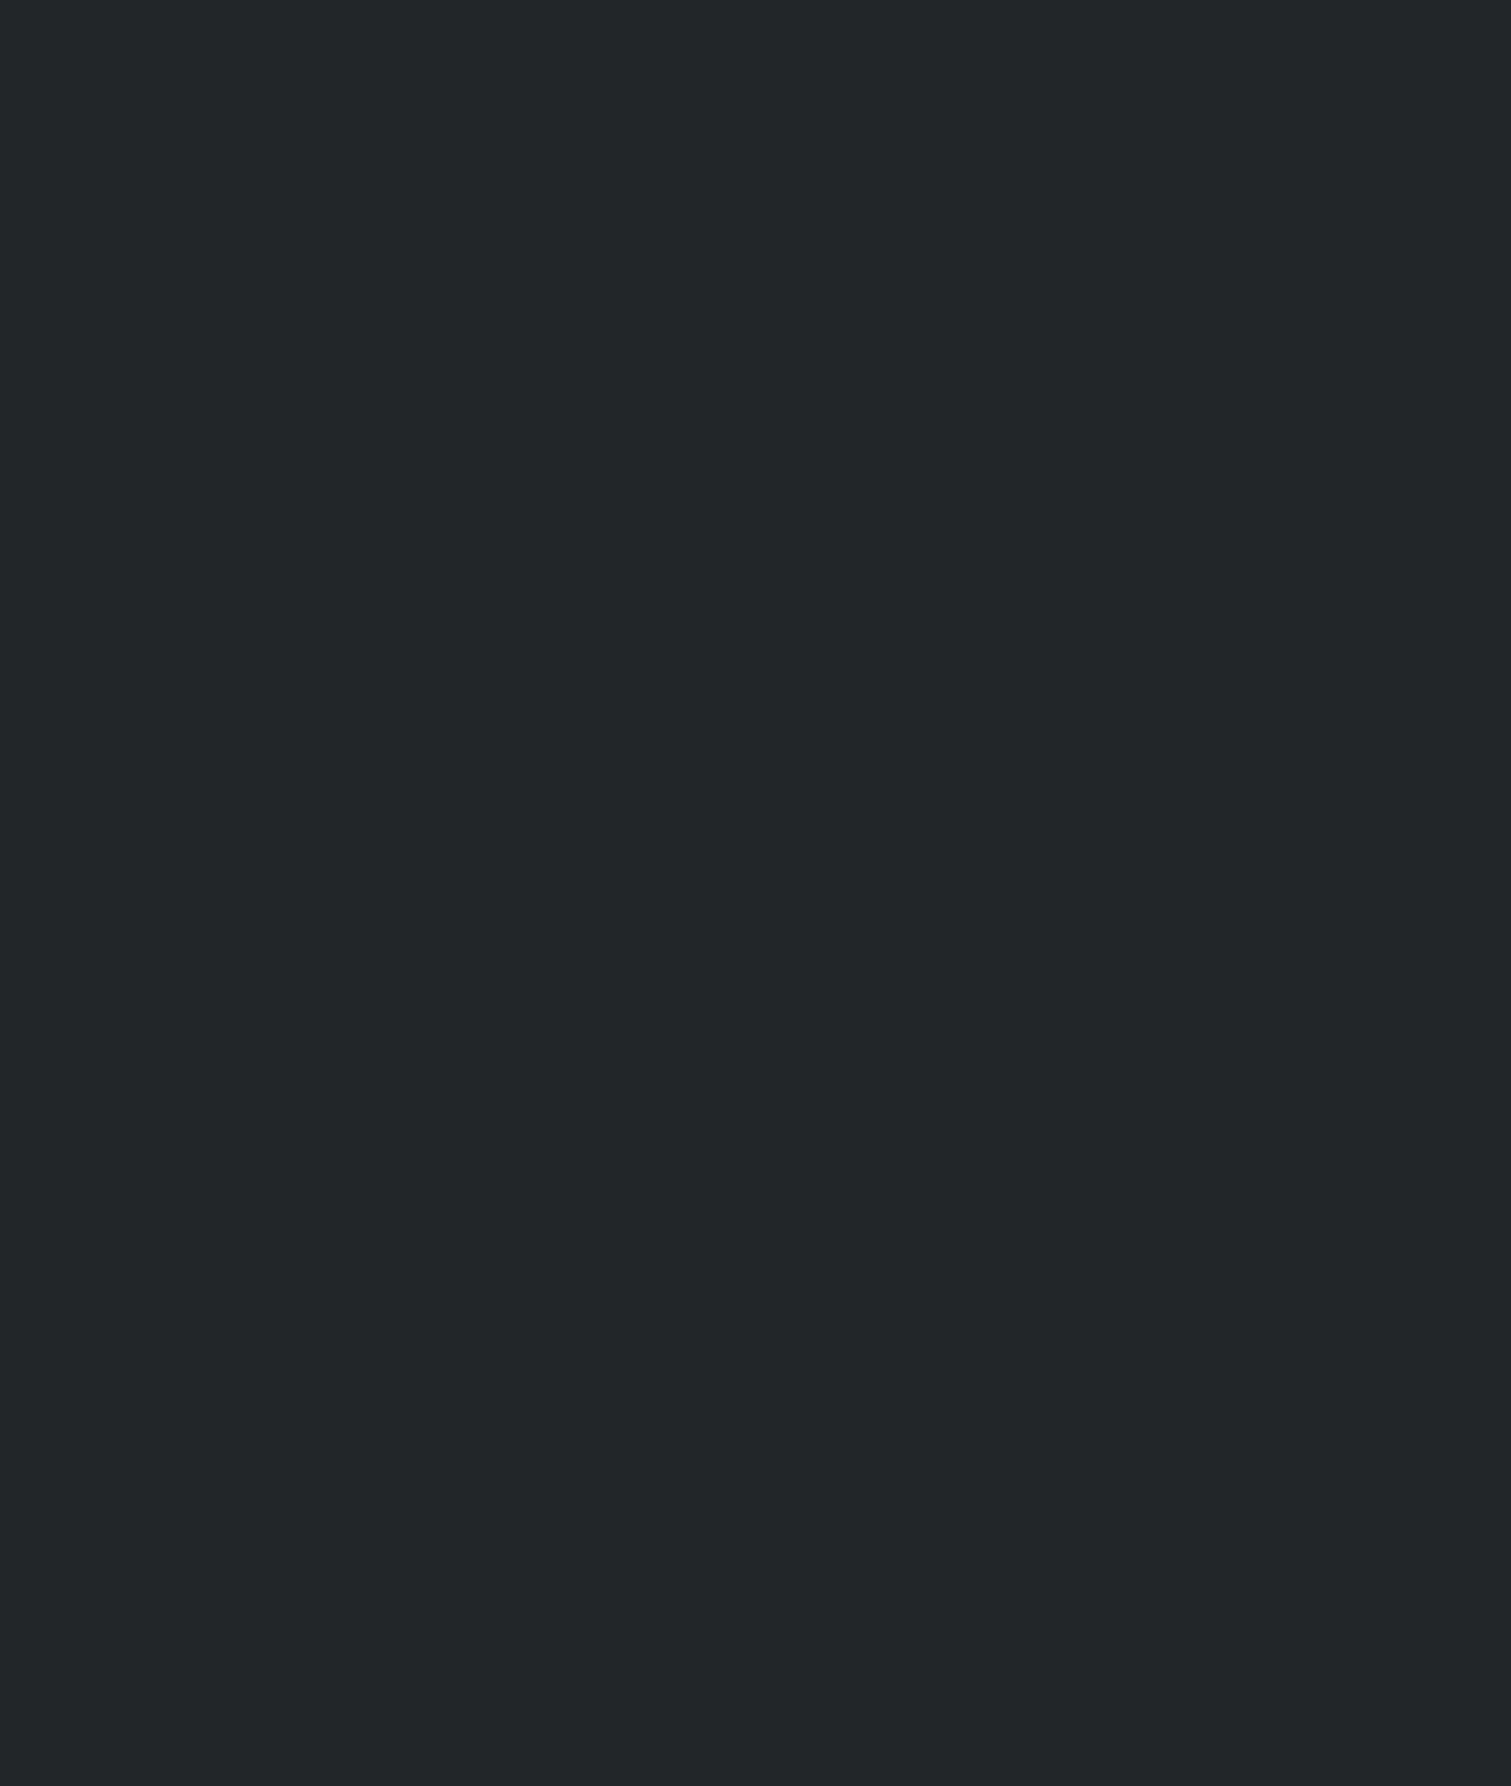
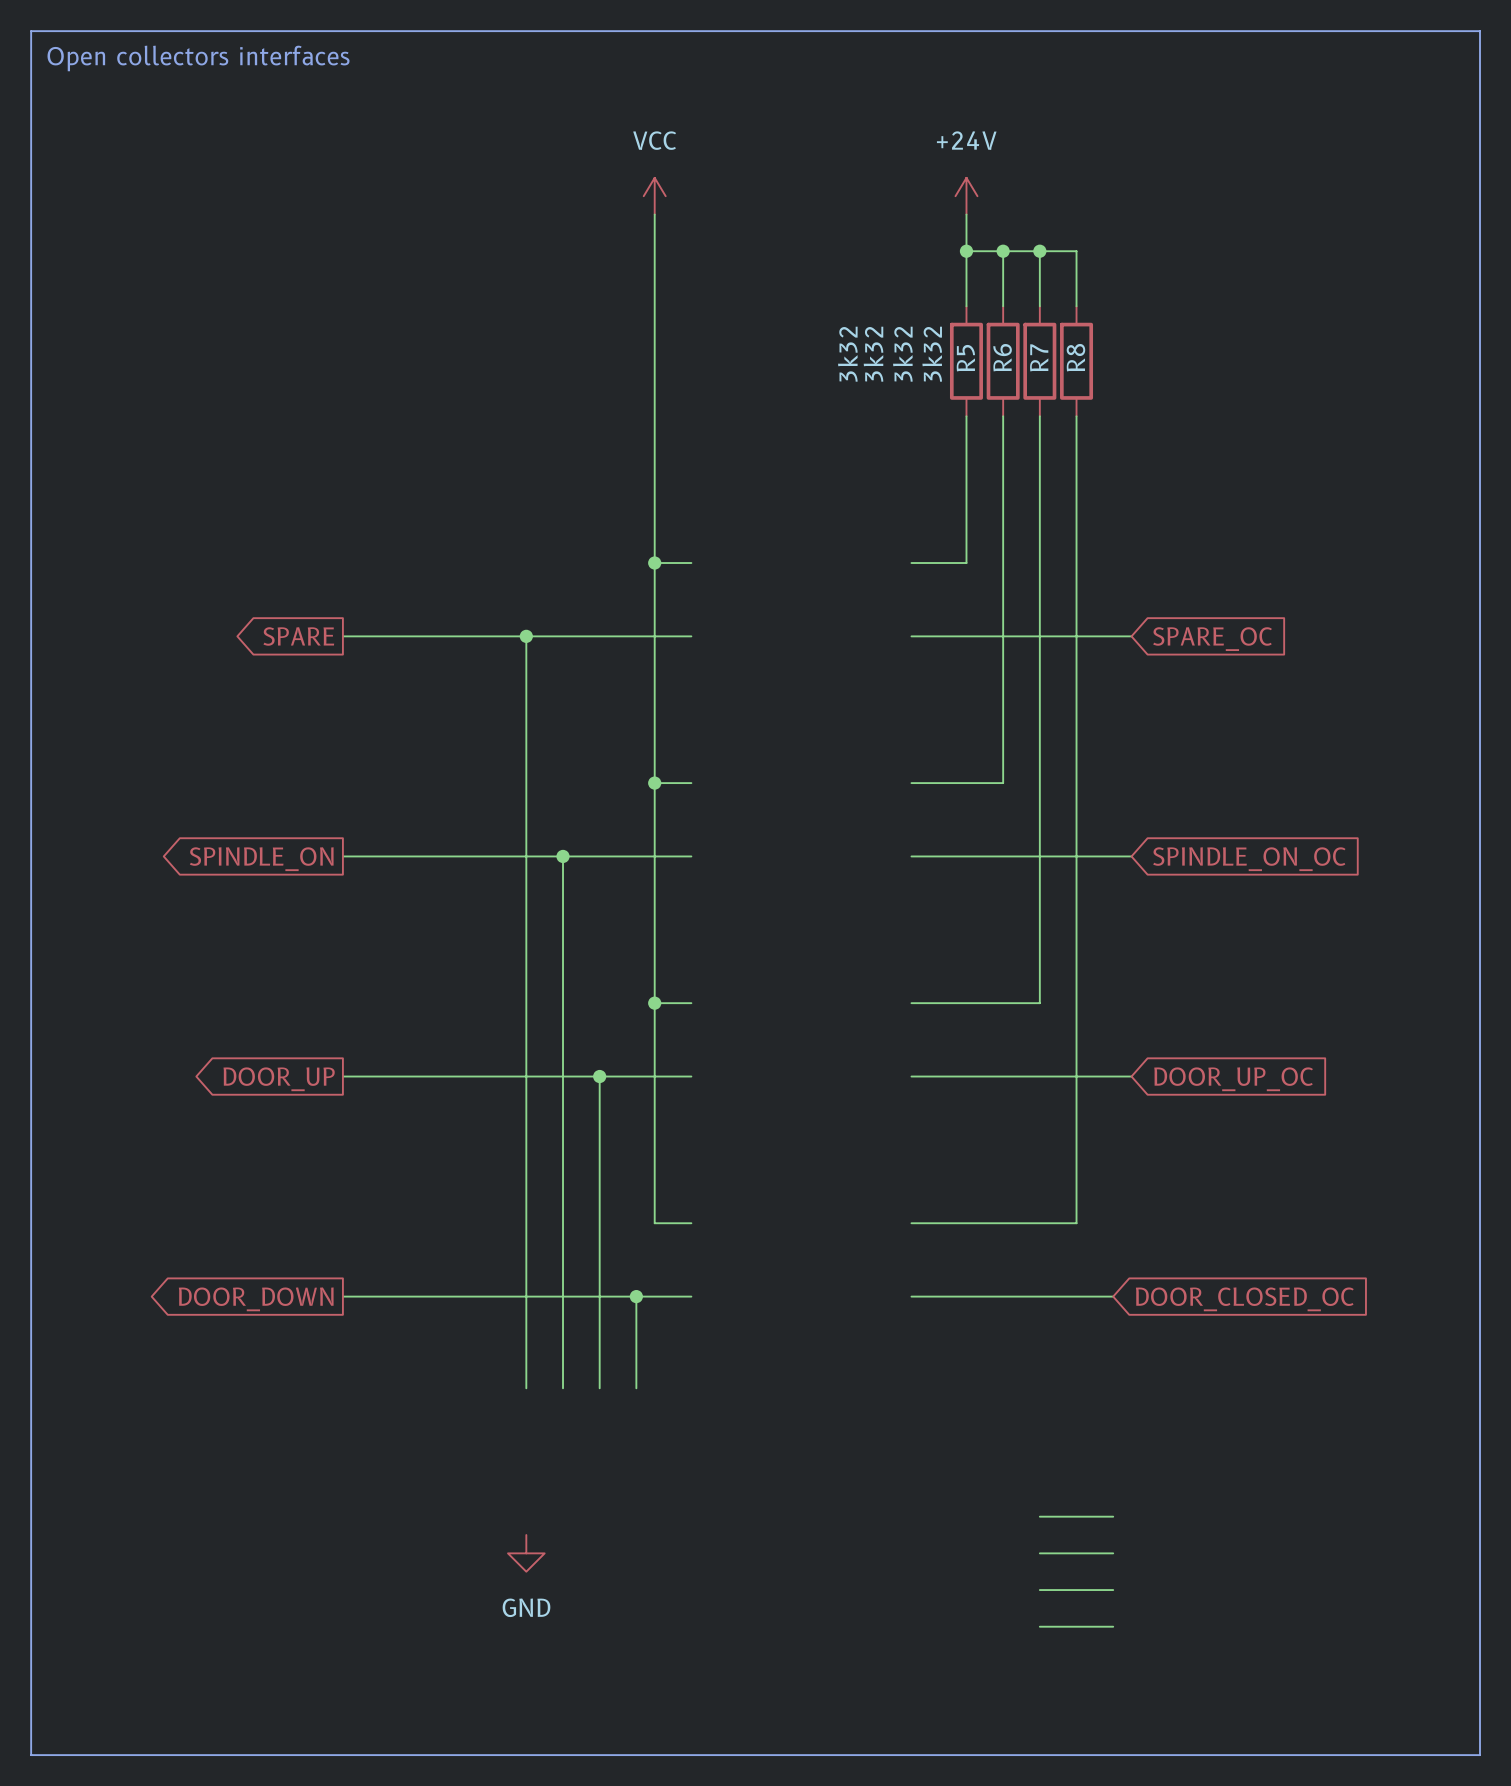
line: none -> (31, 31) (1480, 31) (1480, 1755) (31, 1755) (31, 31)
text: none -> Open collectors interfaces (198, 58)
power symbol: none -> VCC (654, 196)
power symbol: none -> +24V (966, 196)
wire: none -> (654, 214) (654, 1223) (691, 1223)
wire: none -> (966, 214) (966, 306)
wire: none -> (966, 251) (1076, 251) (1076, 306)
junction: none -> (966, 251)
wire: none -> (1003, 251) (1003, 306)
junction: none -> (1003, 251)
wire: none -> (1039, 251) (1039, 306)
junction: none -> (1039, 251)
R5: none -> 3k32 (966, 361)
R6: none -> 3k32 (1003, 361)
R7: none -> 3k32 (1039, 361)
R8: none -> 3k32 (1076, 361)
wire: none -> (966, 416) (966, 563) (911, 563)
wire: none -> (1003, 416) (1003, 783) (911, 783)
wire: none -> (1039, 416) (1039, 1003) (911, 1003)
wire: none -> (1076, 416) (1076, 1223) (911, 1223)
wire: none -> (654, 563) (691, 563)
junction: none -> (654, 563)
global label: none -> SPARE (298, 636)
wire: none -> (342, 636) (691, 636)
wire: none -> (526, 636) (526, 1388)
junction: none -> (526, 636)
wire: none -> (911, 636) (1131, 636)
global label: none -> SPARE_OC (1212, 639)
wire: none -> (654, 783) (691, 783)
junction: none -> (654, 783)
wire: none -> (342, 856) (691, 856)
wire: none -> (563, 856) (563, 1388)
junction: none -> (563, 856)
wire: none -> (911, 856) (1131, 856)
global label: none -> SPINDLE_ON (261, 859)
global label: none -> SPINDLE_ON_OC (1249, 859)
wire: none -> (654, 1003) (691, 1003)
junction: none -> (654, 1003)
wire: none -> (342, 1076) (691, 1076)
wire: none -> (599, 1076) (599, 1388)
junction: none -> (599, 1076)
wire: none -> (911, 1076) (1131, 1076)
global label: none -> DOOR_UP (279, 1079)
global label: none -> DOOR_UP_OC (1233, 1079)
wire: none -> (342, 1296) (691, 1296)
wire: none -> (636, 1296) (636, 1388)
junction: none -> (636, 1296)
wire: none -> (911, 1296) (1113, 1296)
global label: none -> DOOR_DOWN (256, 1299)
global label: none -> DOOR_CLOSED_OC (1244, 1299)
wire: none -> (1039, 1516) (1113, 1516)
power symbol: none -> GND (526, 1553)
wire: none -> (1039, 1553) (1113, 1553)
wire: none -> (1039, 1590) (1113, 1590)
wire: none -> (1039, 1626) (1113, 1626)

